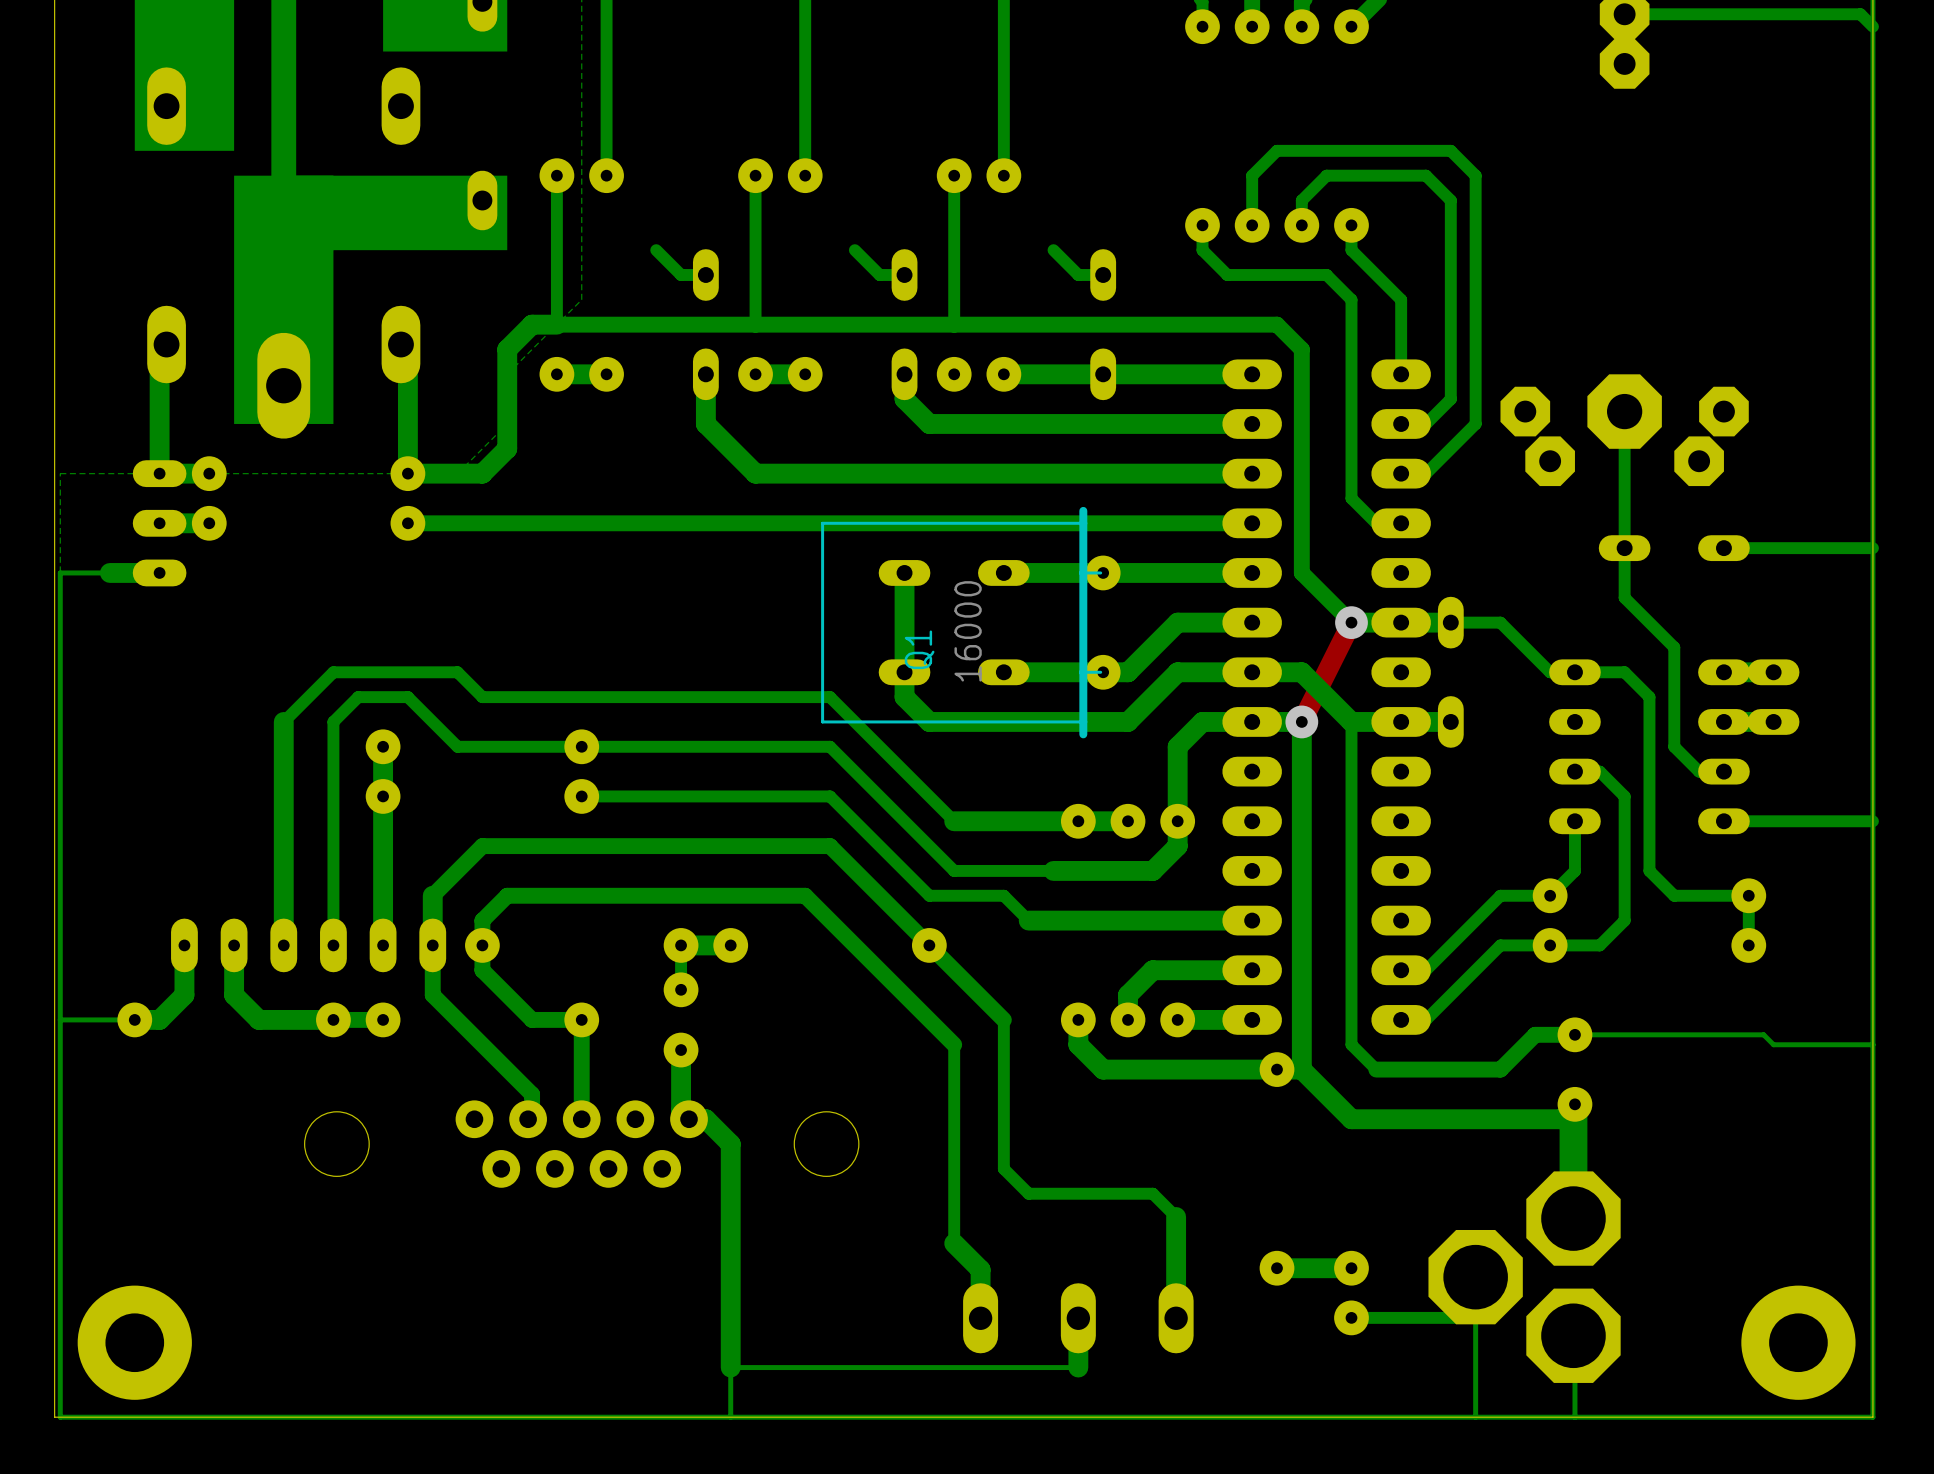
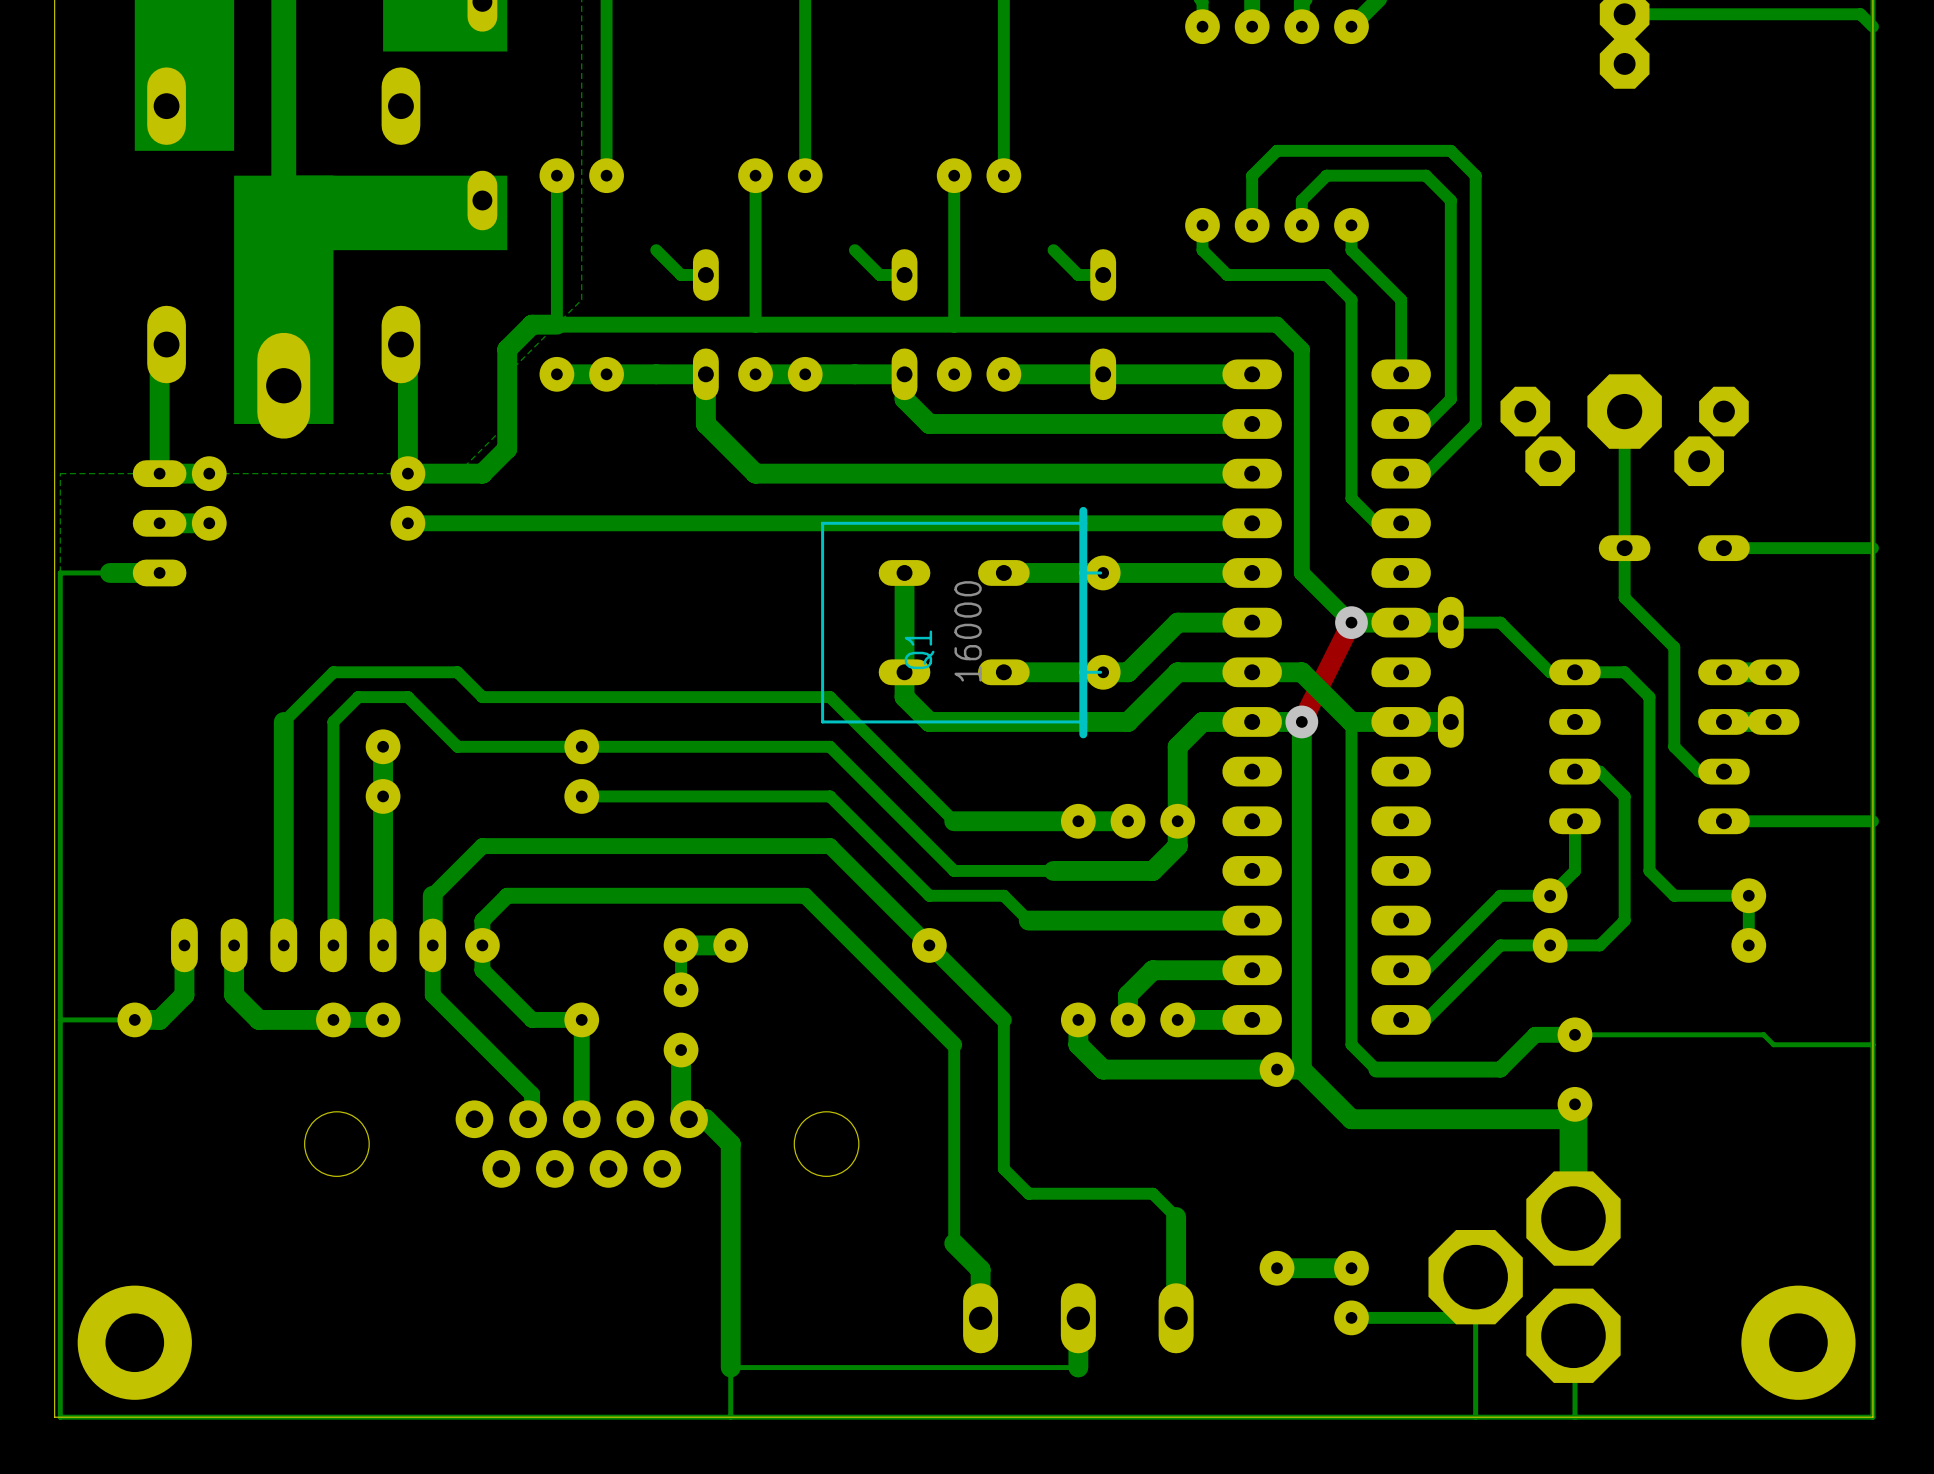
bottom track: none -> (705, 374) (606, 374)
bottom track: none -> (904, 374) (805, 374)

